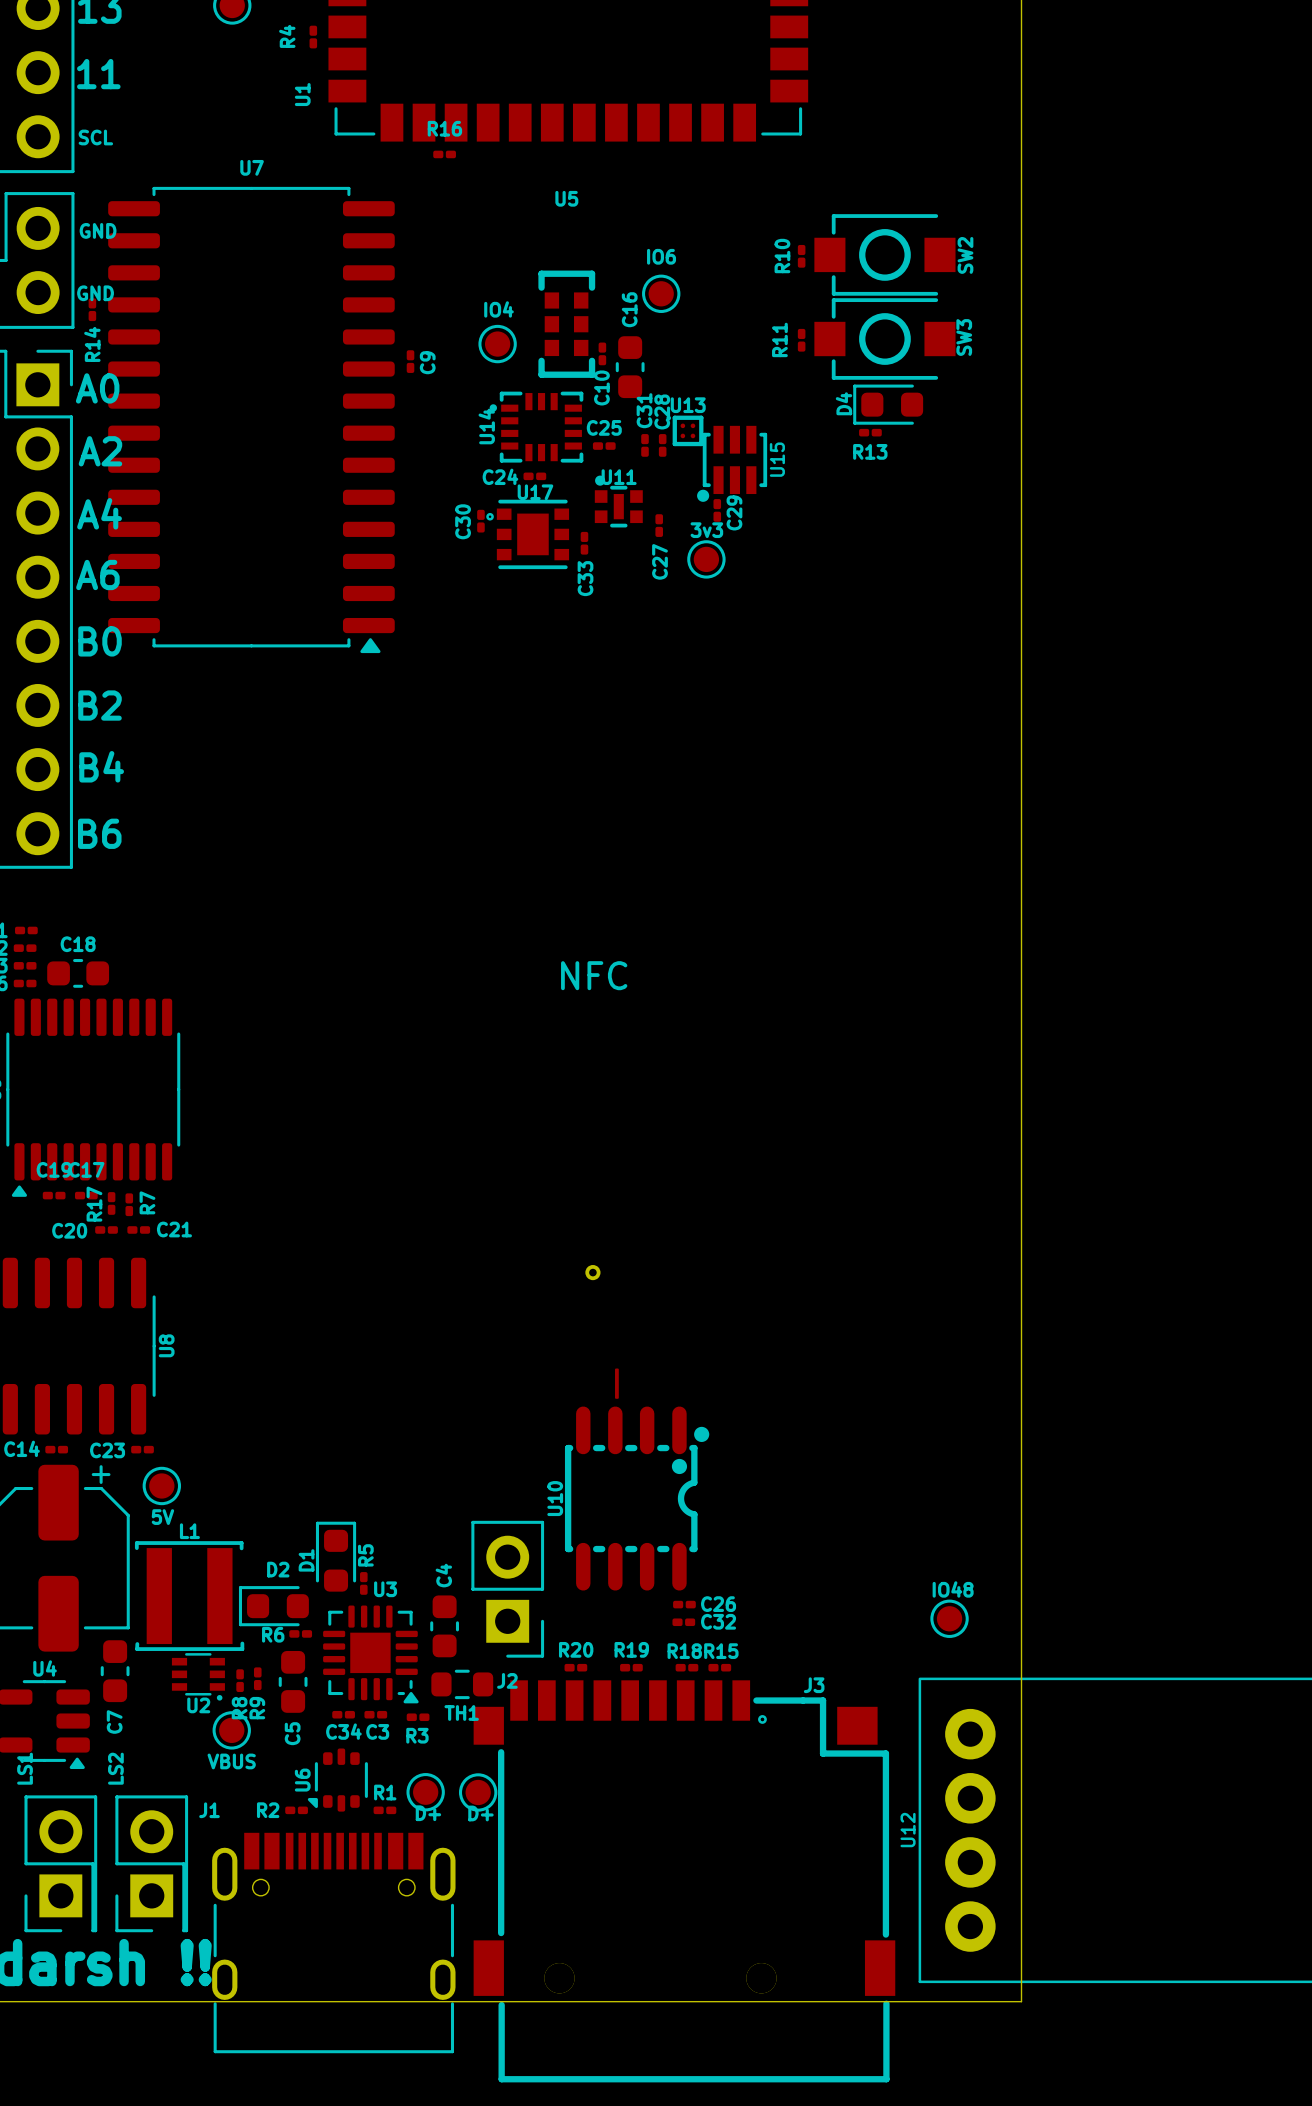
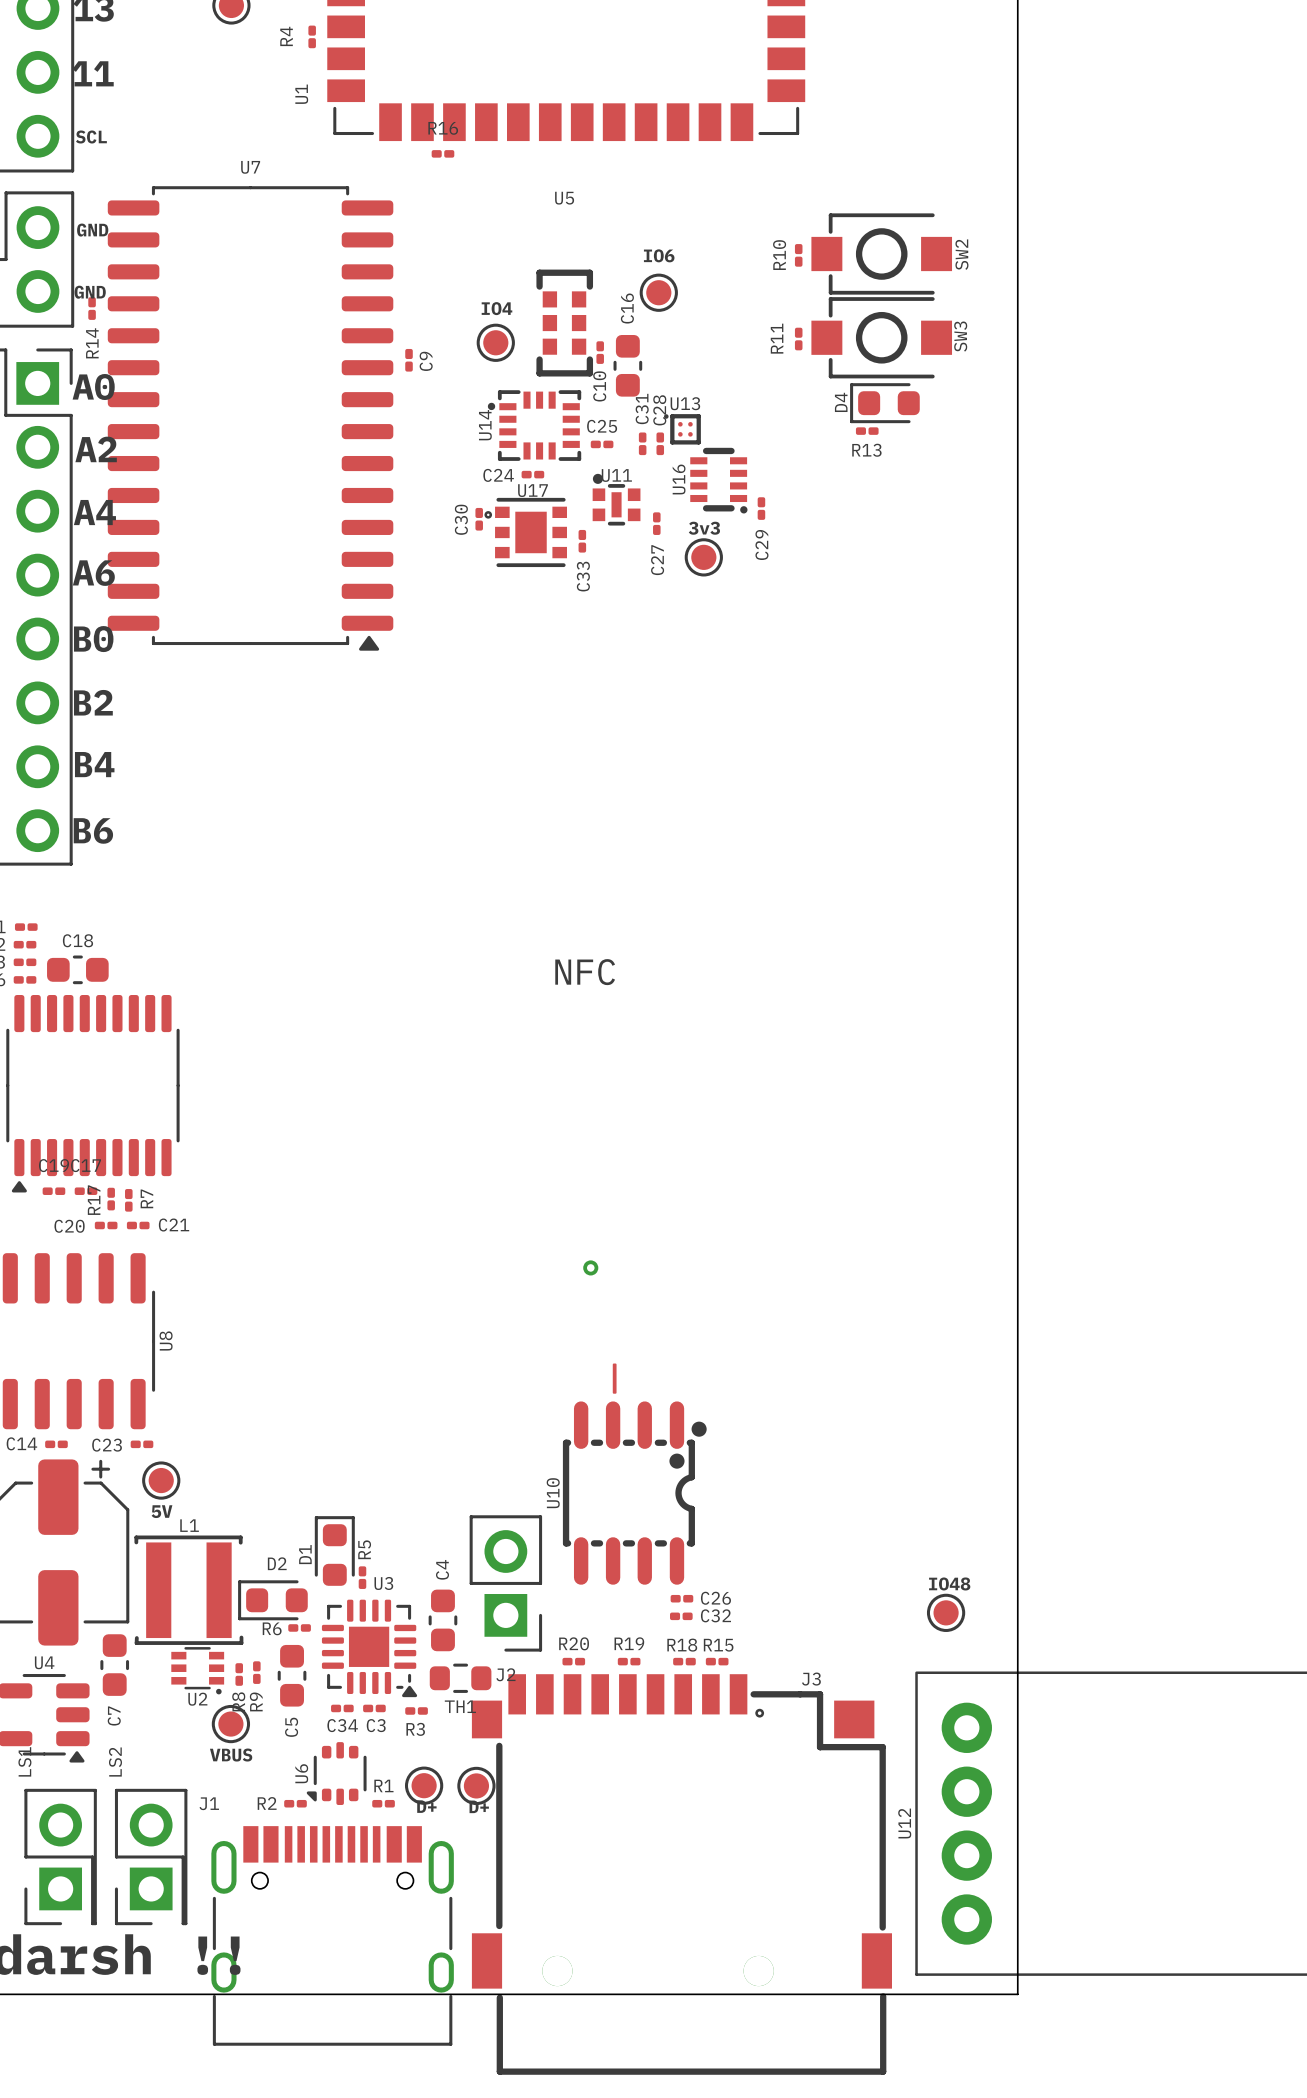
U15: (732, 463) -> none
U16: none -> (718, 480)
C29 position: (717, 510) -> (761, 508)
C29 name position: C29 (734, 512) -> C29 (761, 544)

